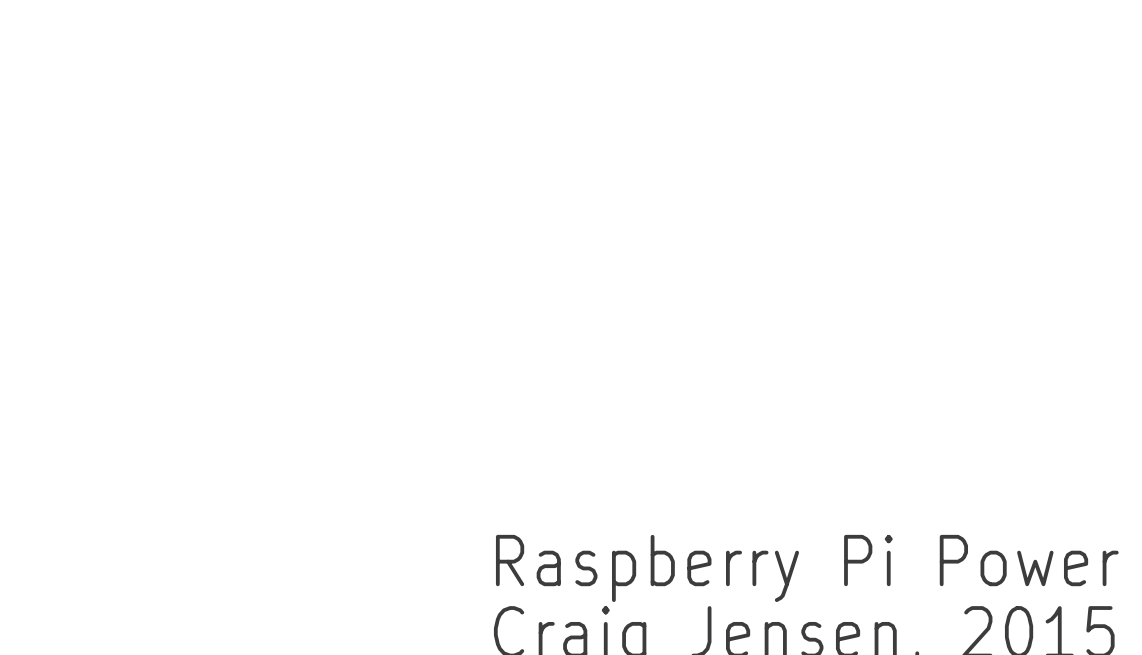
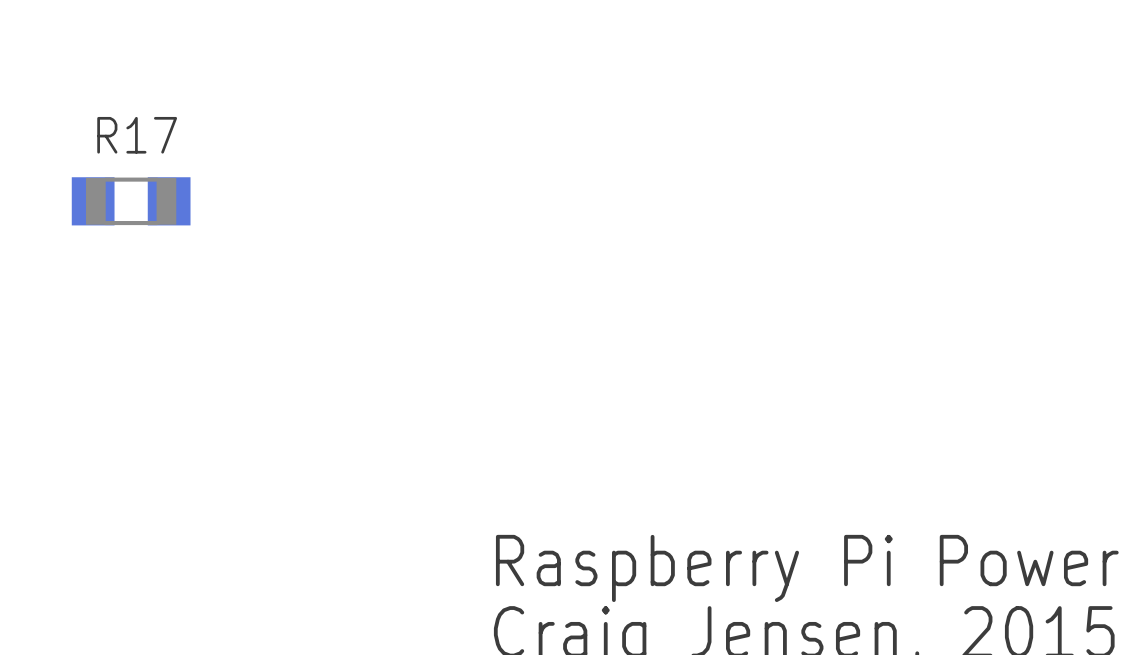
R17: none -> (131, 201)

